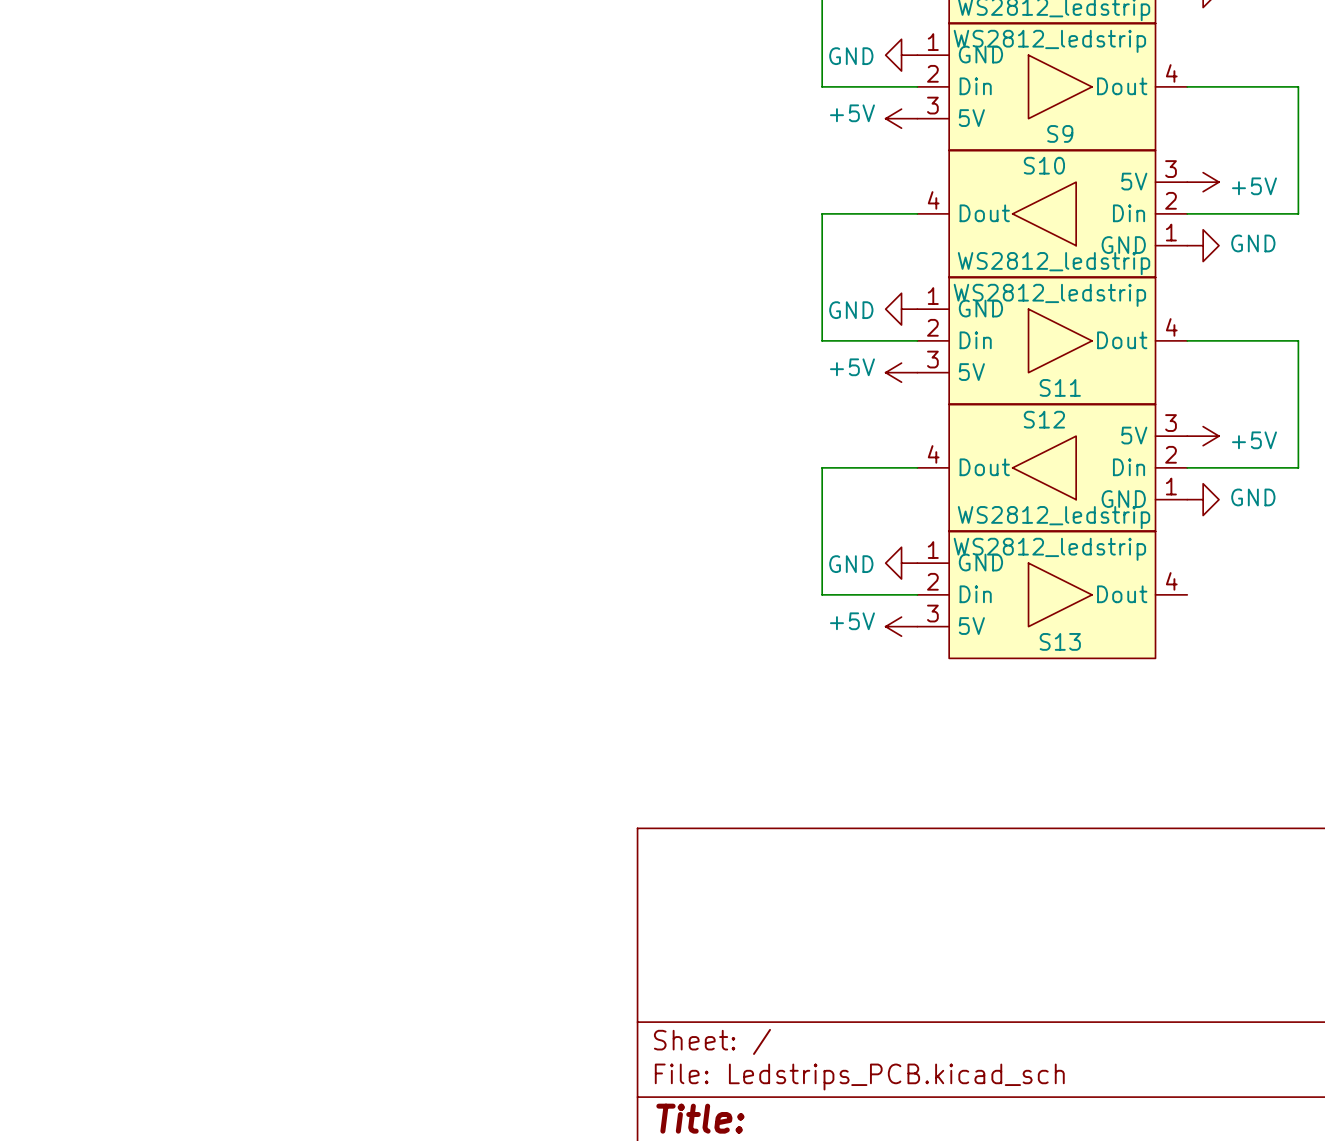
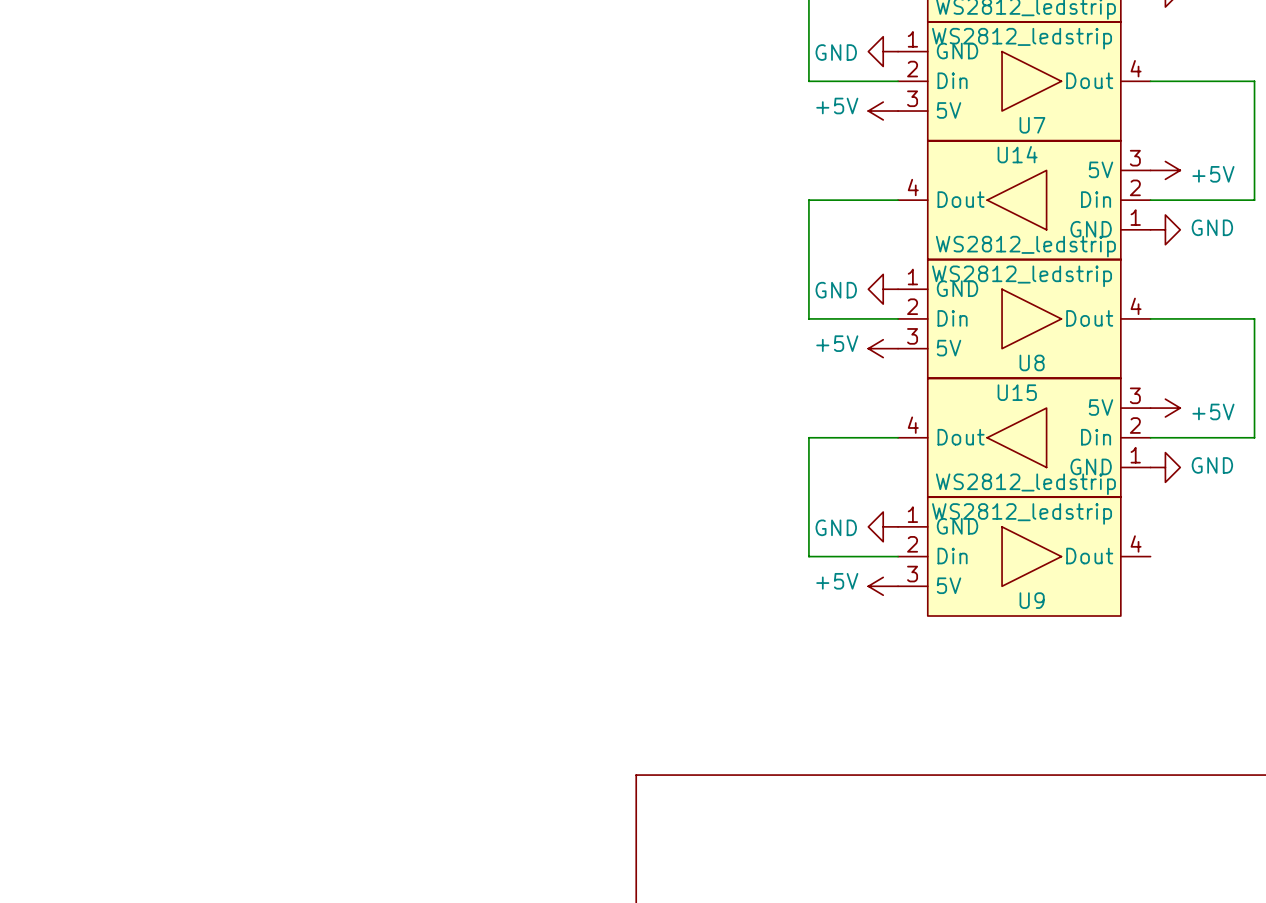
S9 name: S9 (1060, 133) -> U7 (1032, 125)
S10 name: S10 (1044, 165) -> U14 (1017, 154)
S11 name: S11 (1060, 387) -> U8 (1032, 362)
S12 name: S12 (1044, 419) -> U15 (1017, 392)
S13 name: S13 (1060, 641) -> U9 (1032, 600)

